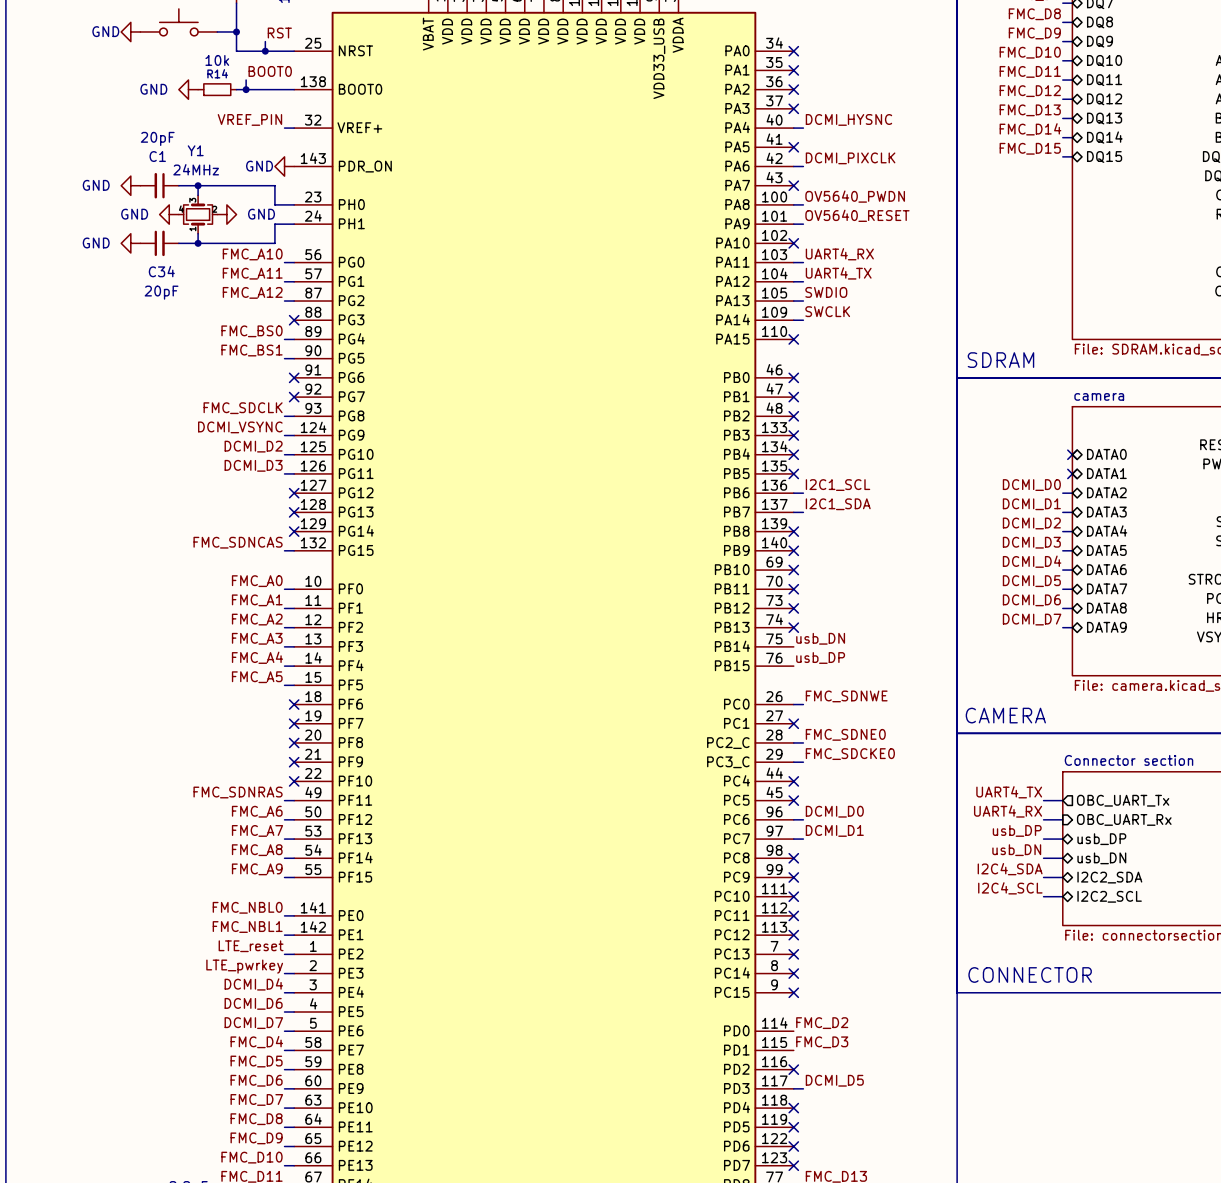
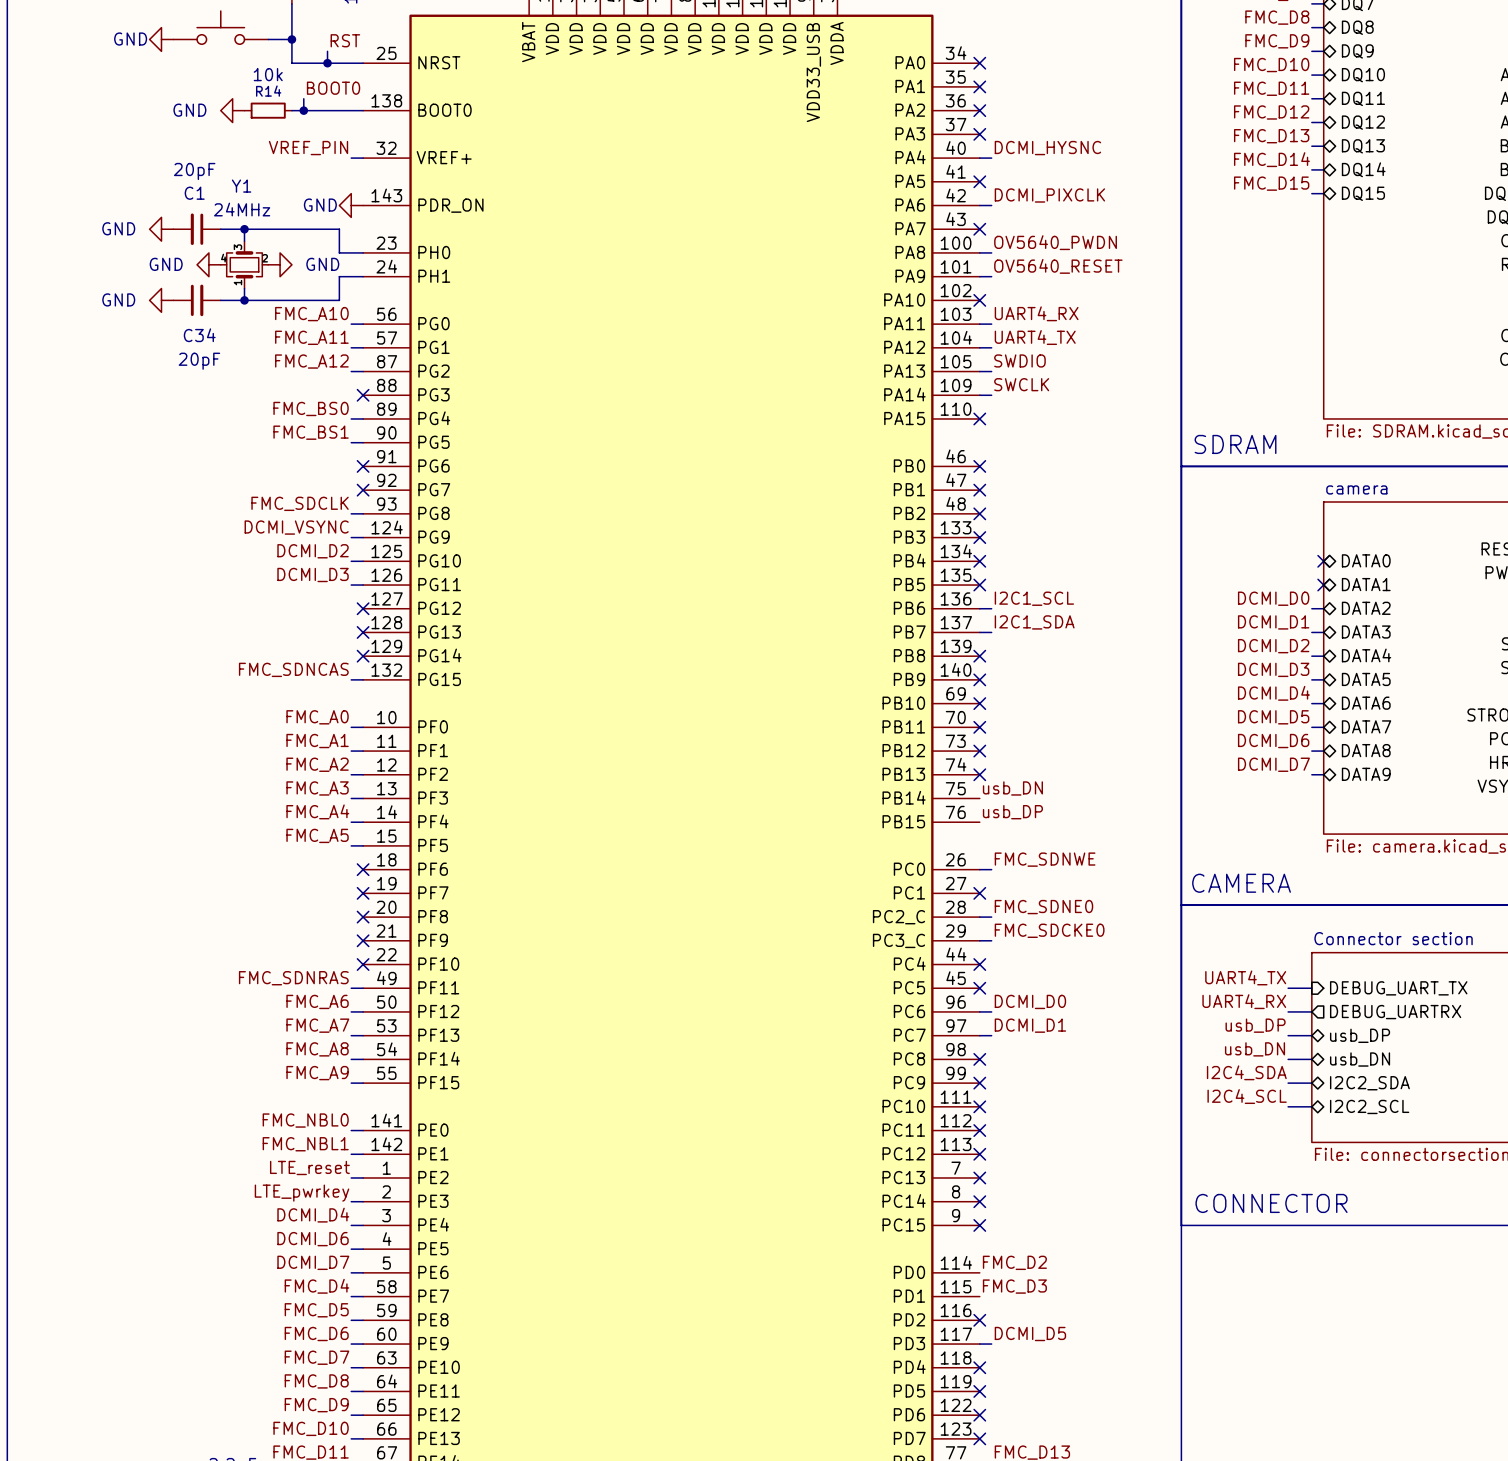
sheet pin shape: output (1123, 800) -> input (1398, 988)
sheet pin: OBC_UART_Tx (1123, 800) -> DEBUG_UART_TX (1398, 988)
sheet pin shape: input (1124, 819) -> output (1395, 1012)
sheet pin: OBC_UART_Rx (1124, 819) -> DEBUG_UARTRX (1395, 1012)

